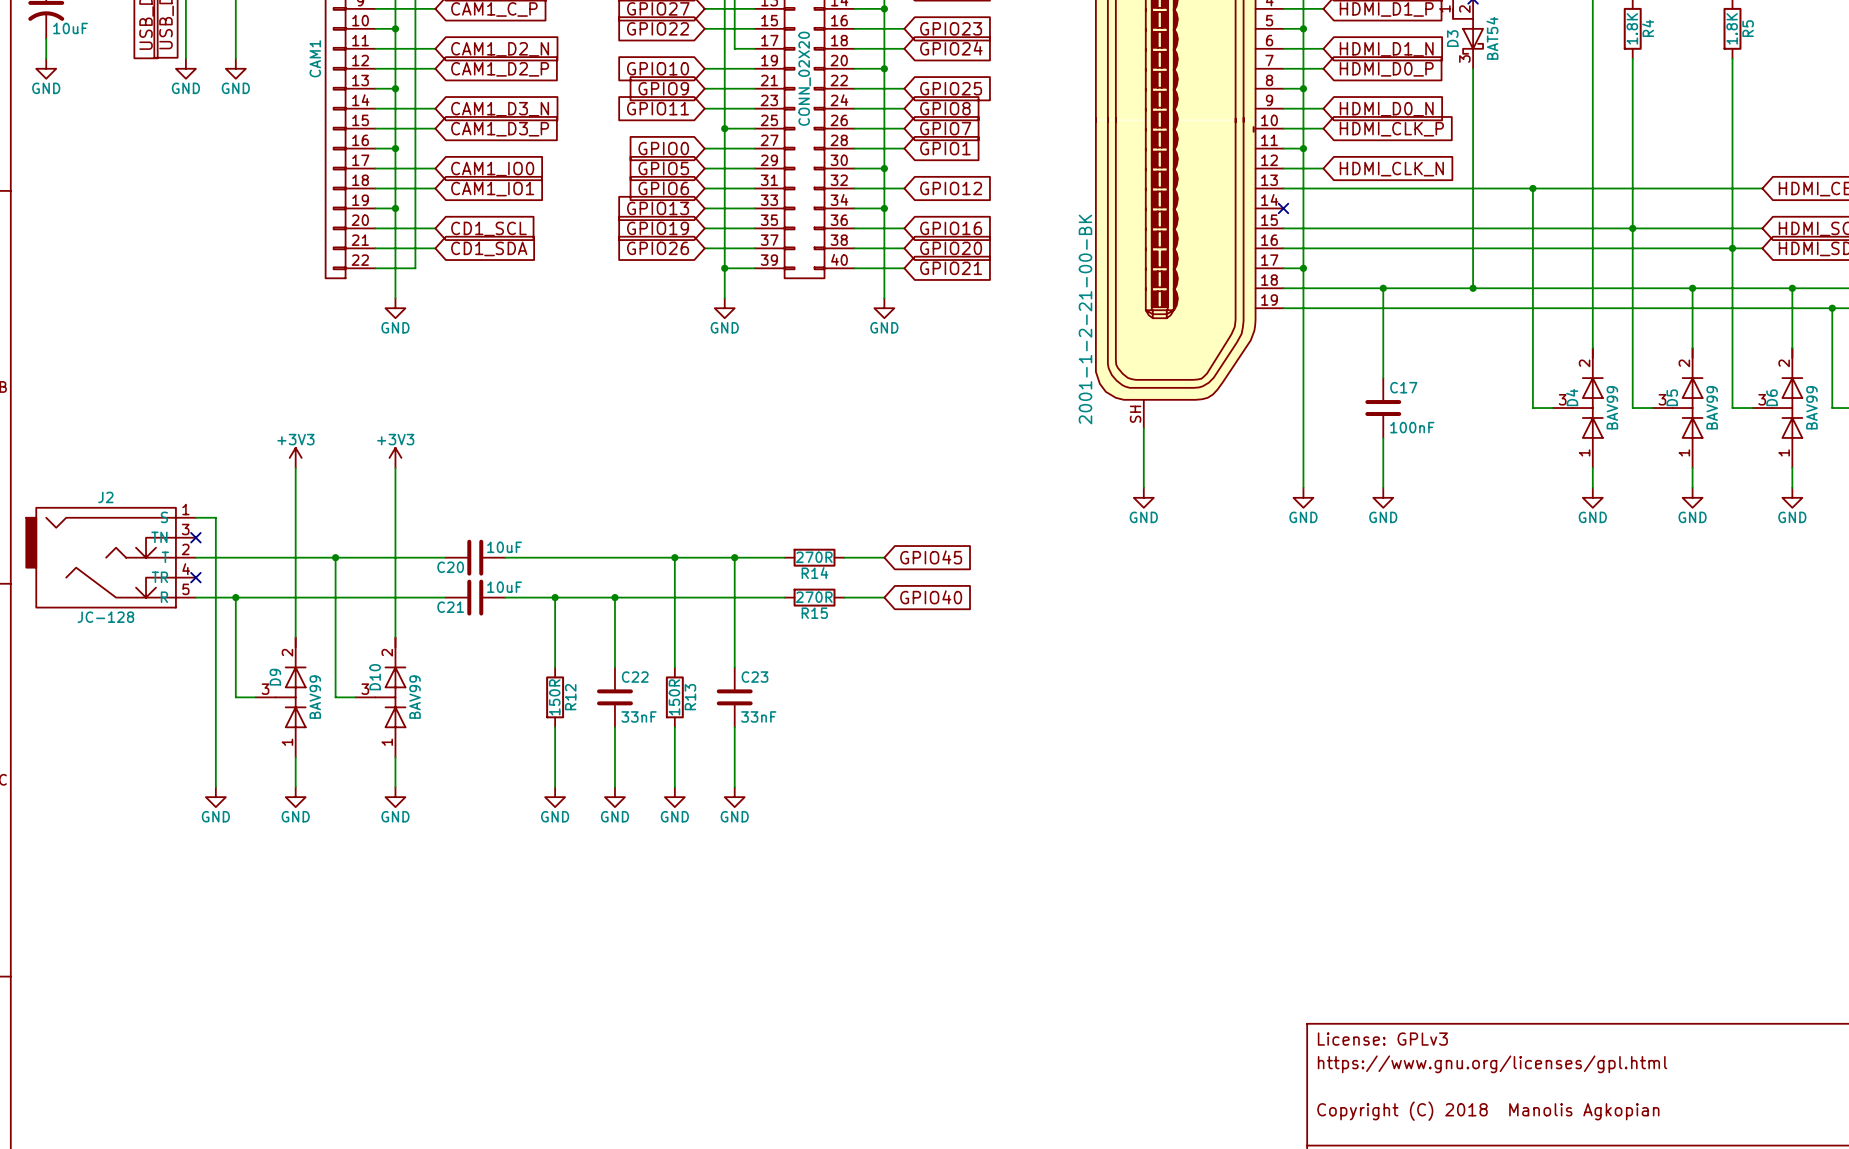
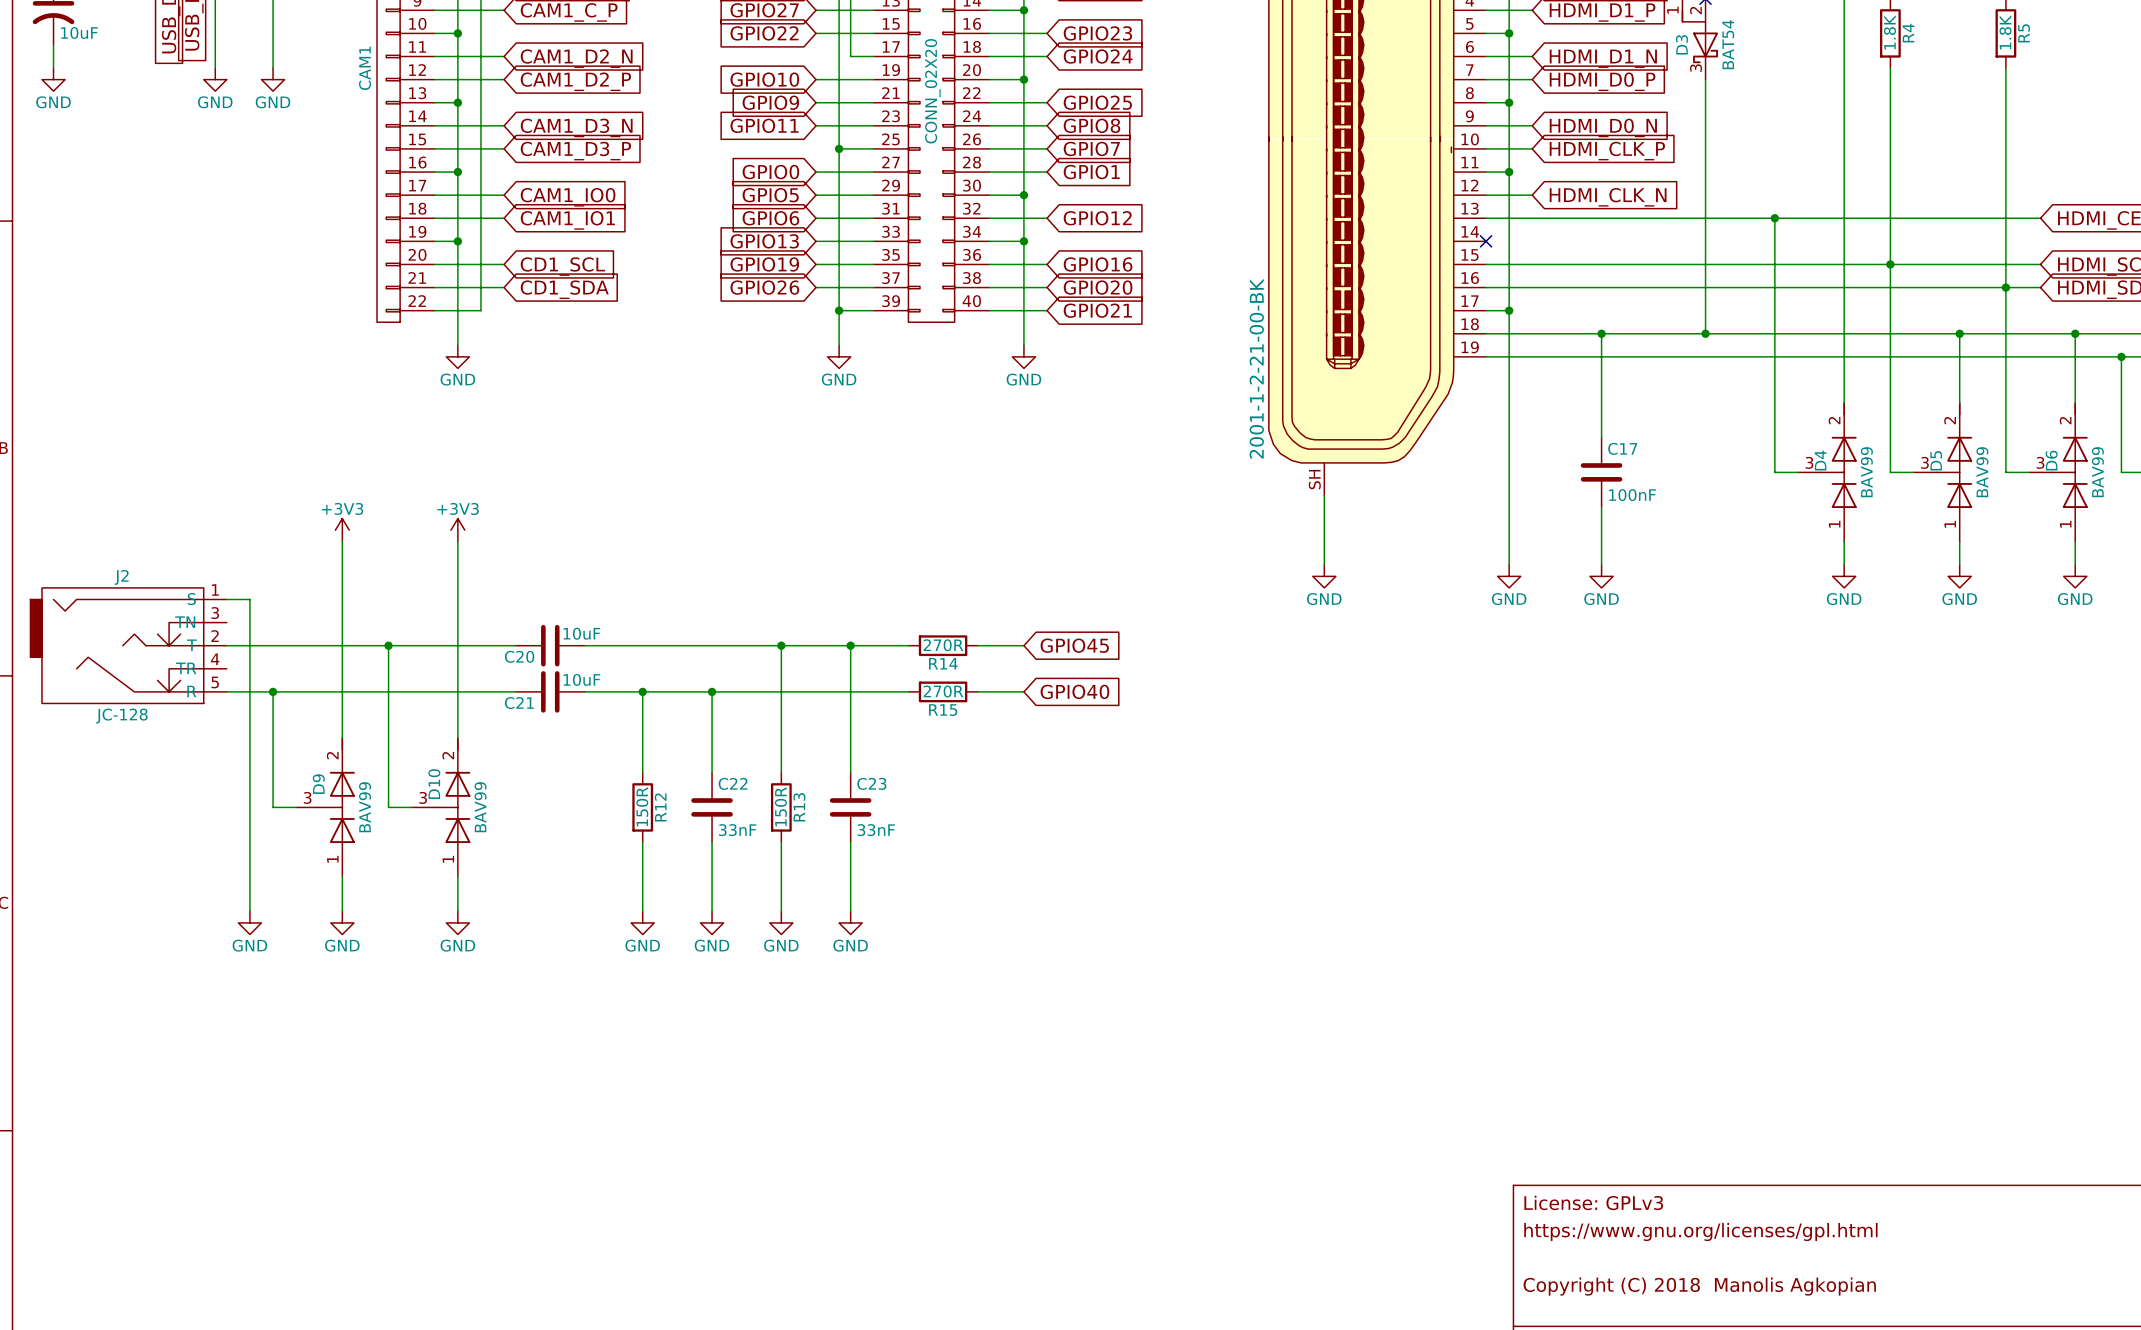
no-connect mark: (195, 537) -> none
no-connect mark: (195, 577) -> none

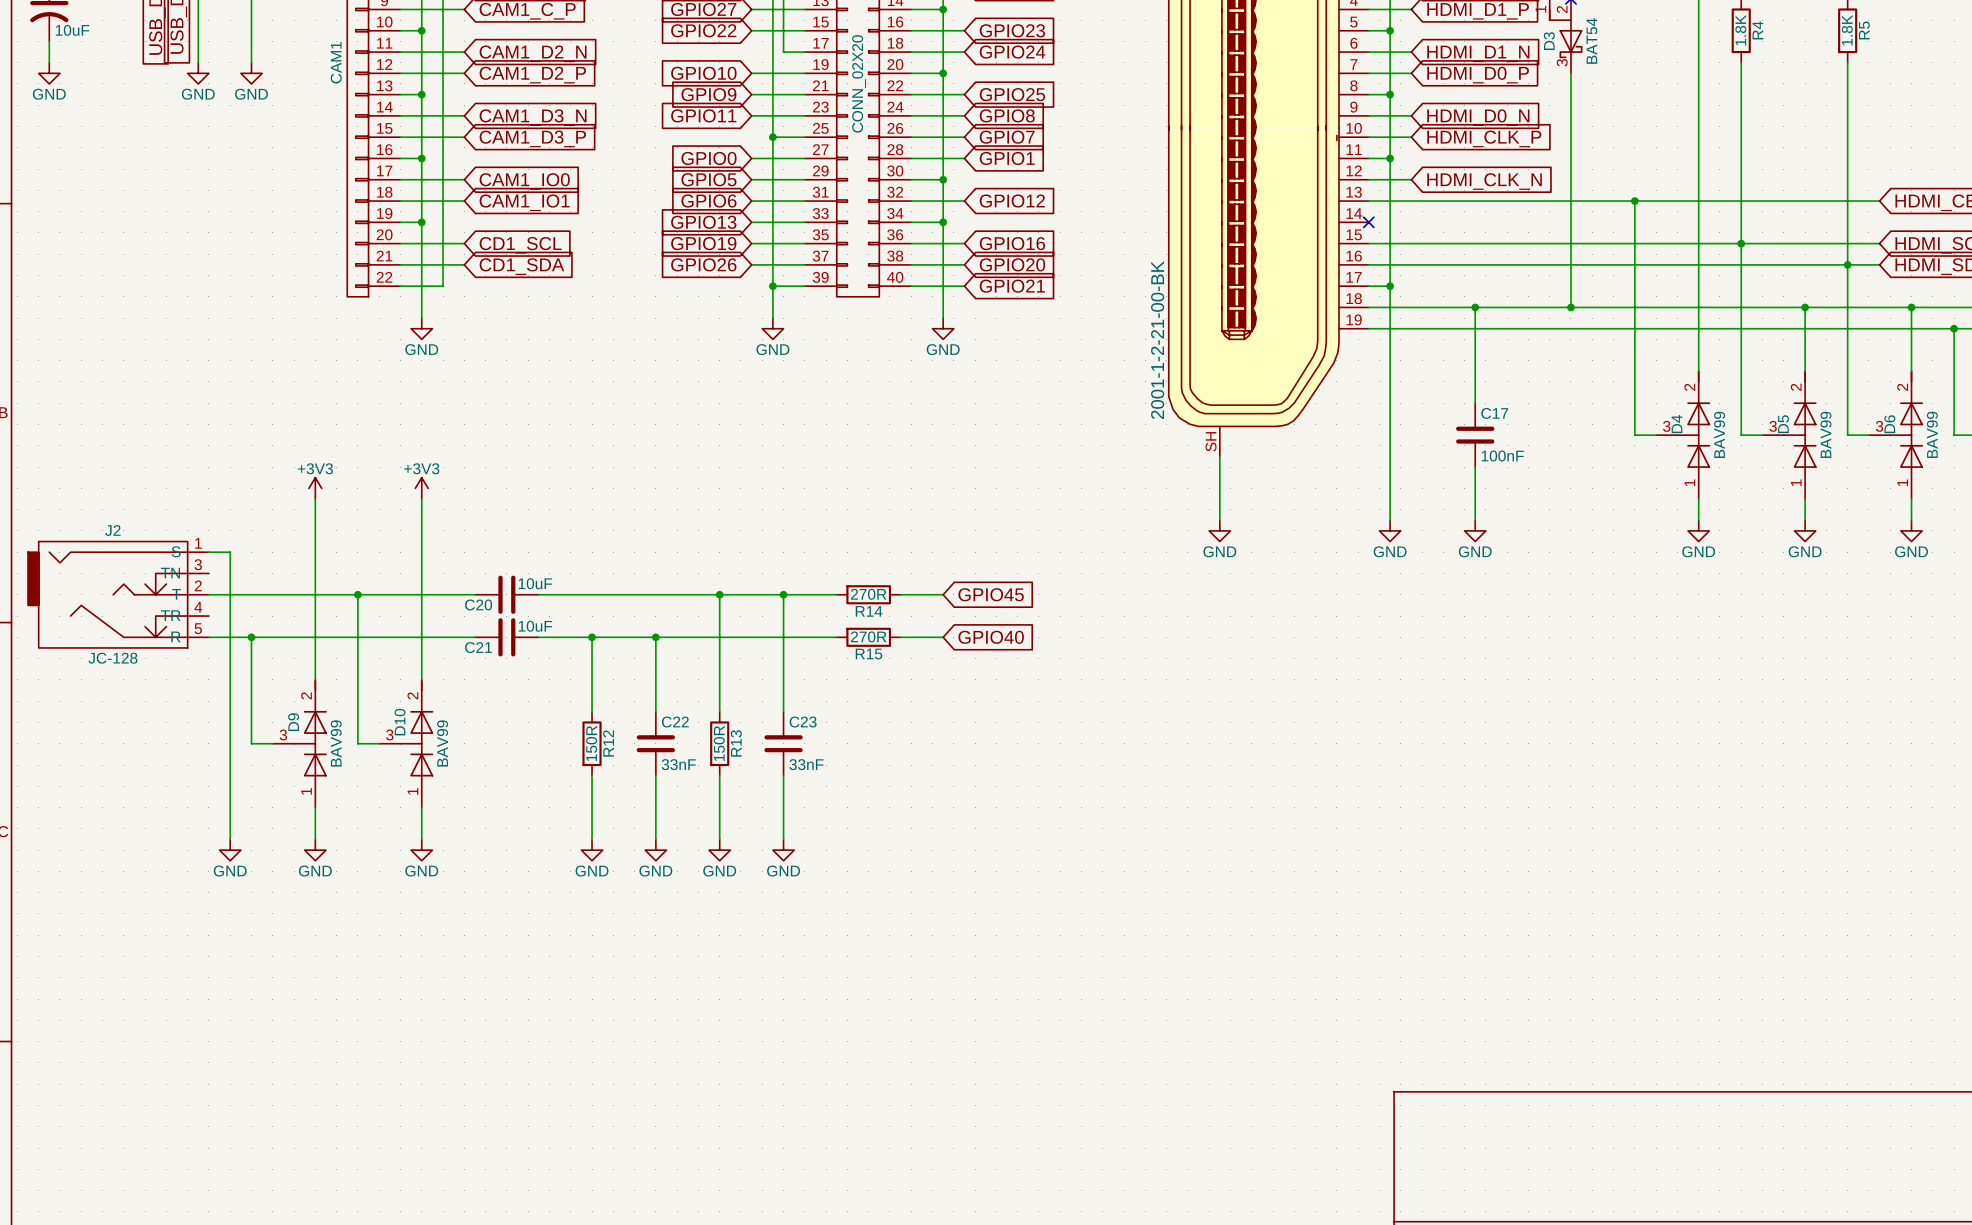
title block: License: GPLv3 (1593, 1202) -> none
title block: https://www.gnu.org/licenses/gpl.html (1700, 1231) -> none
title block: Copyright (C) 2018 Manolis Agkopian (1699, 1286) -> none

